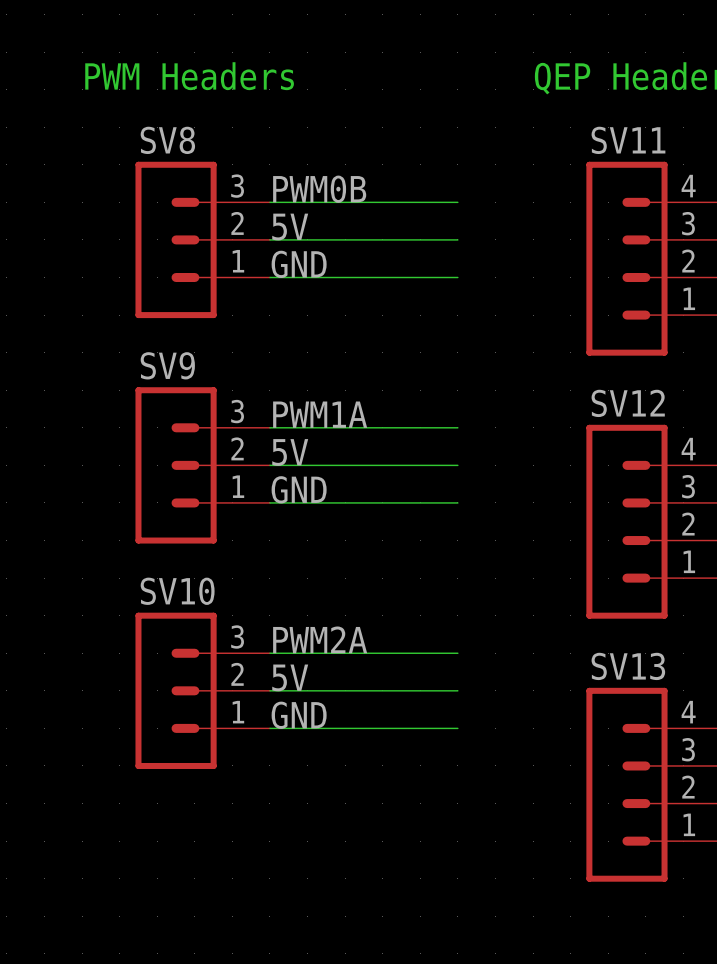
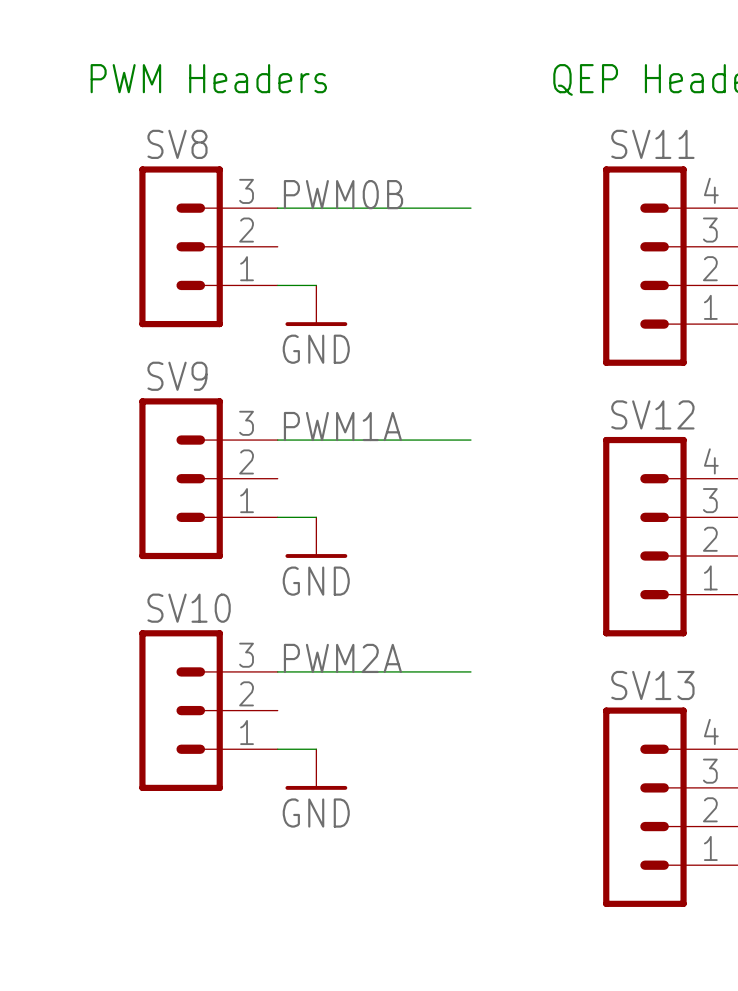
label: 5V (290, 227) -> none
wire: (269, 239) (457, 239) -> none
label: GND (299, 264) -> none
wire: (307, 277) (457, 277) -> none
power symbol: none -> GND (316, 305)
label: 5V (290, 452) -> none
wire: (269, 465) (457, 465) -> none
label: GND (299, 489) -> none
wire: (307, 502) (457, 502) -> none
power symbol: none -> GND (316, 537)
label: 5V (290, 677) -> none
wire: (269, 690) (457, 690) -> none
label: GND (299, 715) -> none
wire: (307, 728) (457, 728) -> none
power symbol: none -> GND (316, 769)

